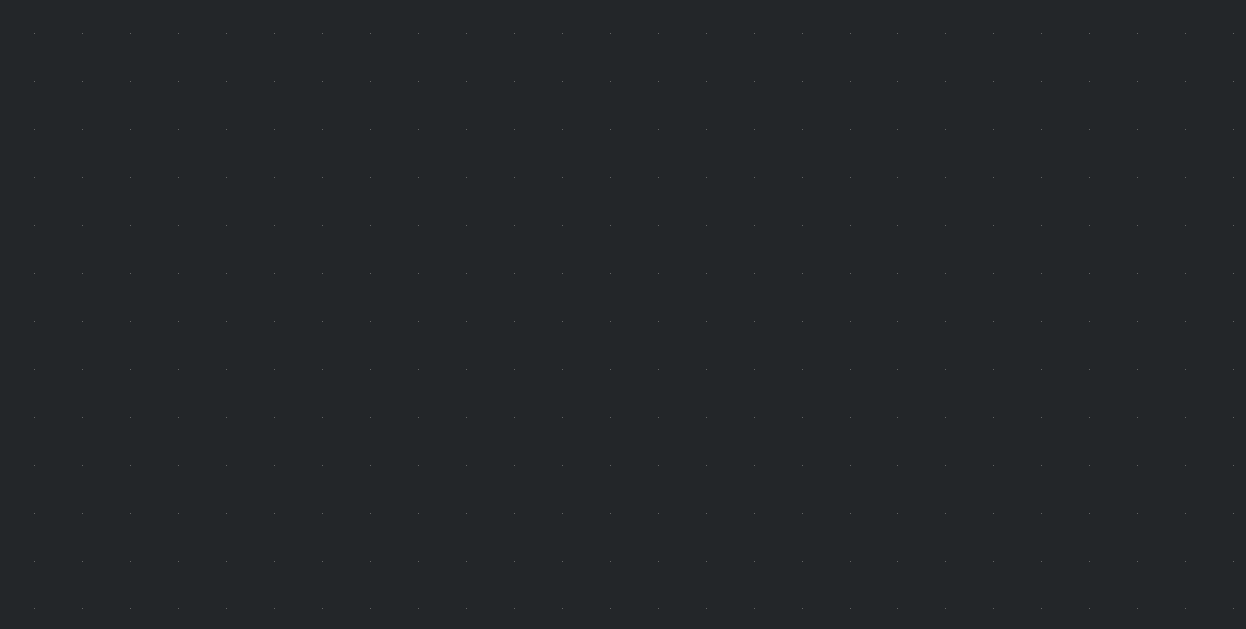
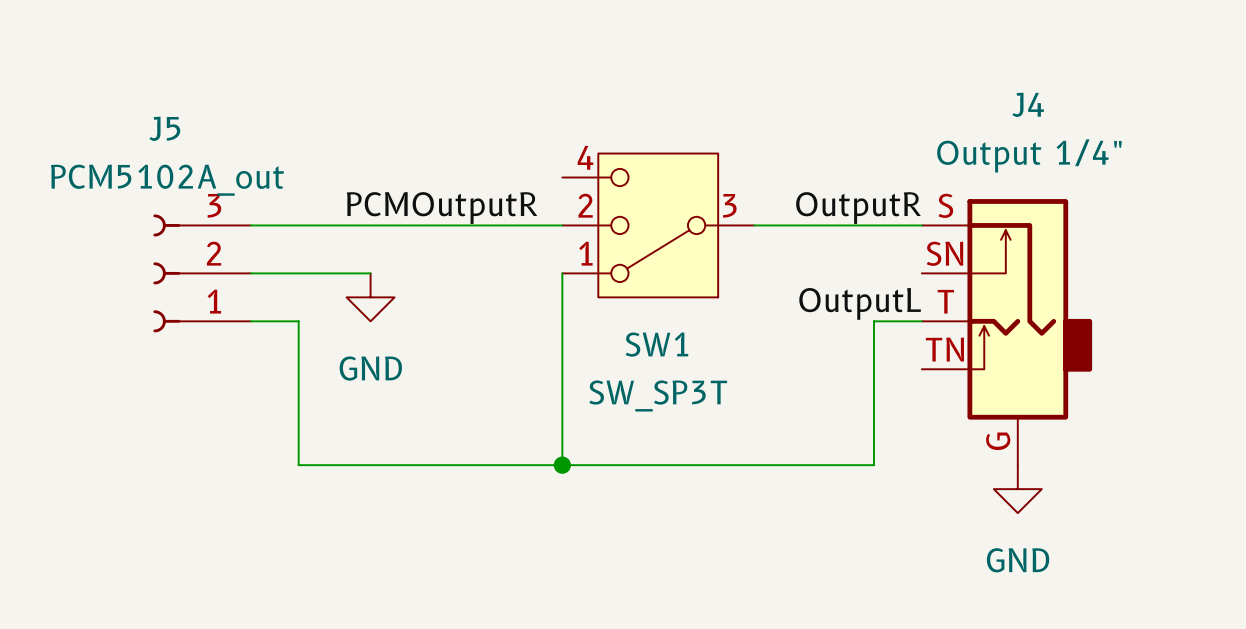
label: none -> PCMOutputR (442, 208)
label: none -> OutputR (858, 208)
wire: none -> (250, 225) (562, 225)
SW1: none -> SW_SP3T (658, 225)
wire: none -> (754, 225) (921, 225)
J5: none -> PCM5102A_out (202, 273)
wire: none -> (250, 273) (370, 273)
wire: none -> (562, 273) (562, 465)
power symbol: none -> GND (370, 297)
label: none -> OutputL (860, 303)
wire: none -> (250, 321) (298, 321) (298, 465) (873, 465) (873, 321) (921, 321)
J4: none -> Output 1/4" (1007, 332)
junction: none -> (562, 465)
power symbol: none -> GND (1017, 489)

